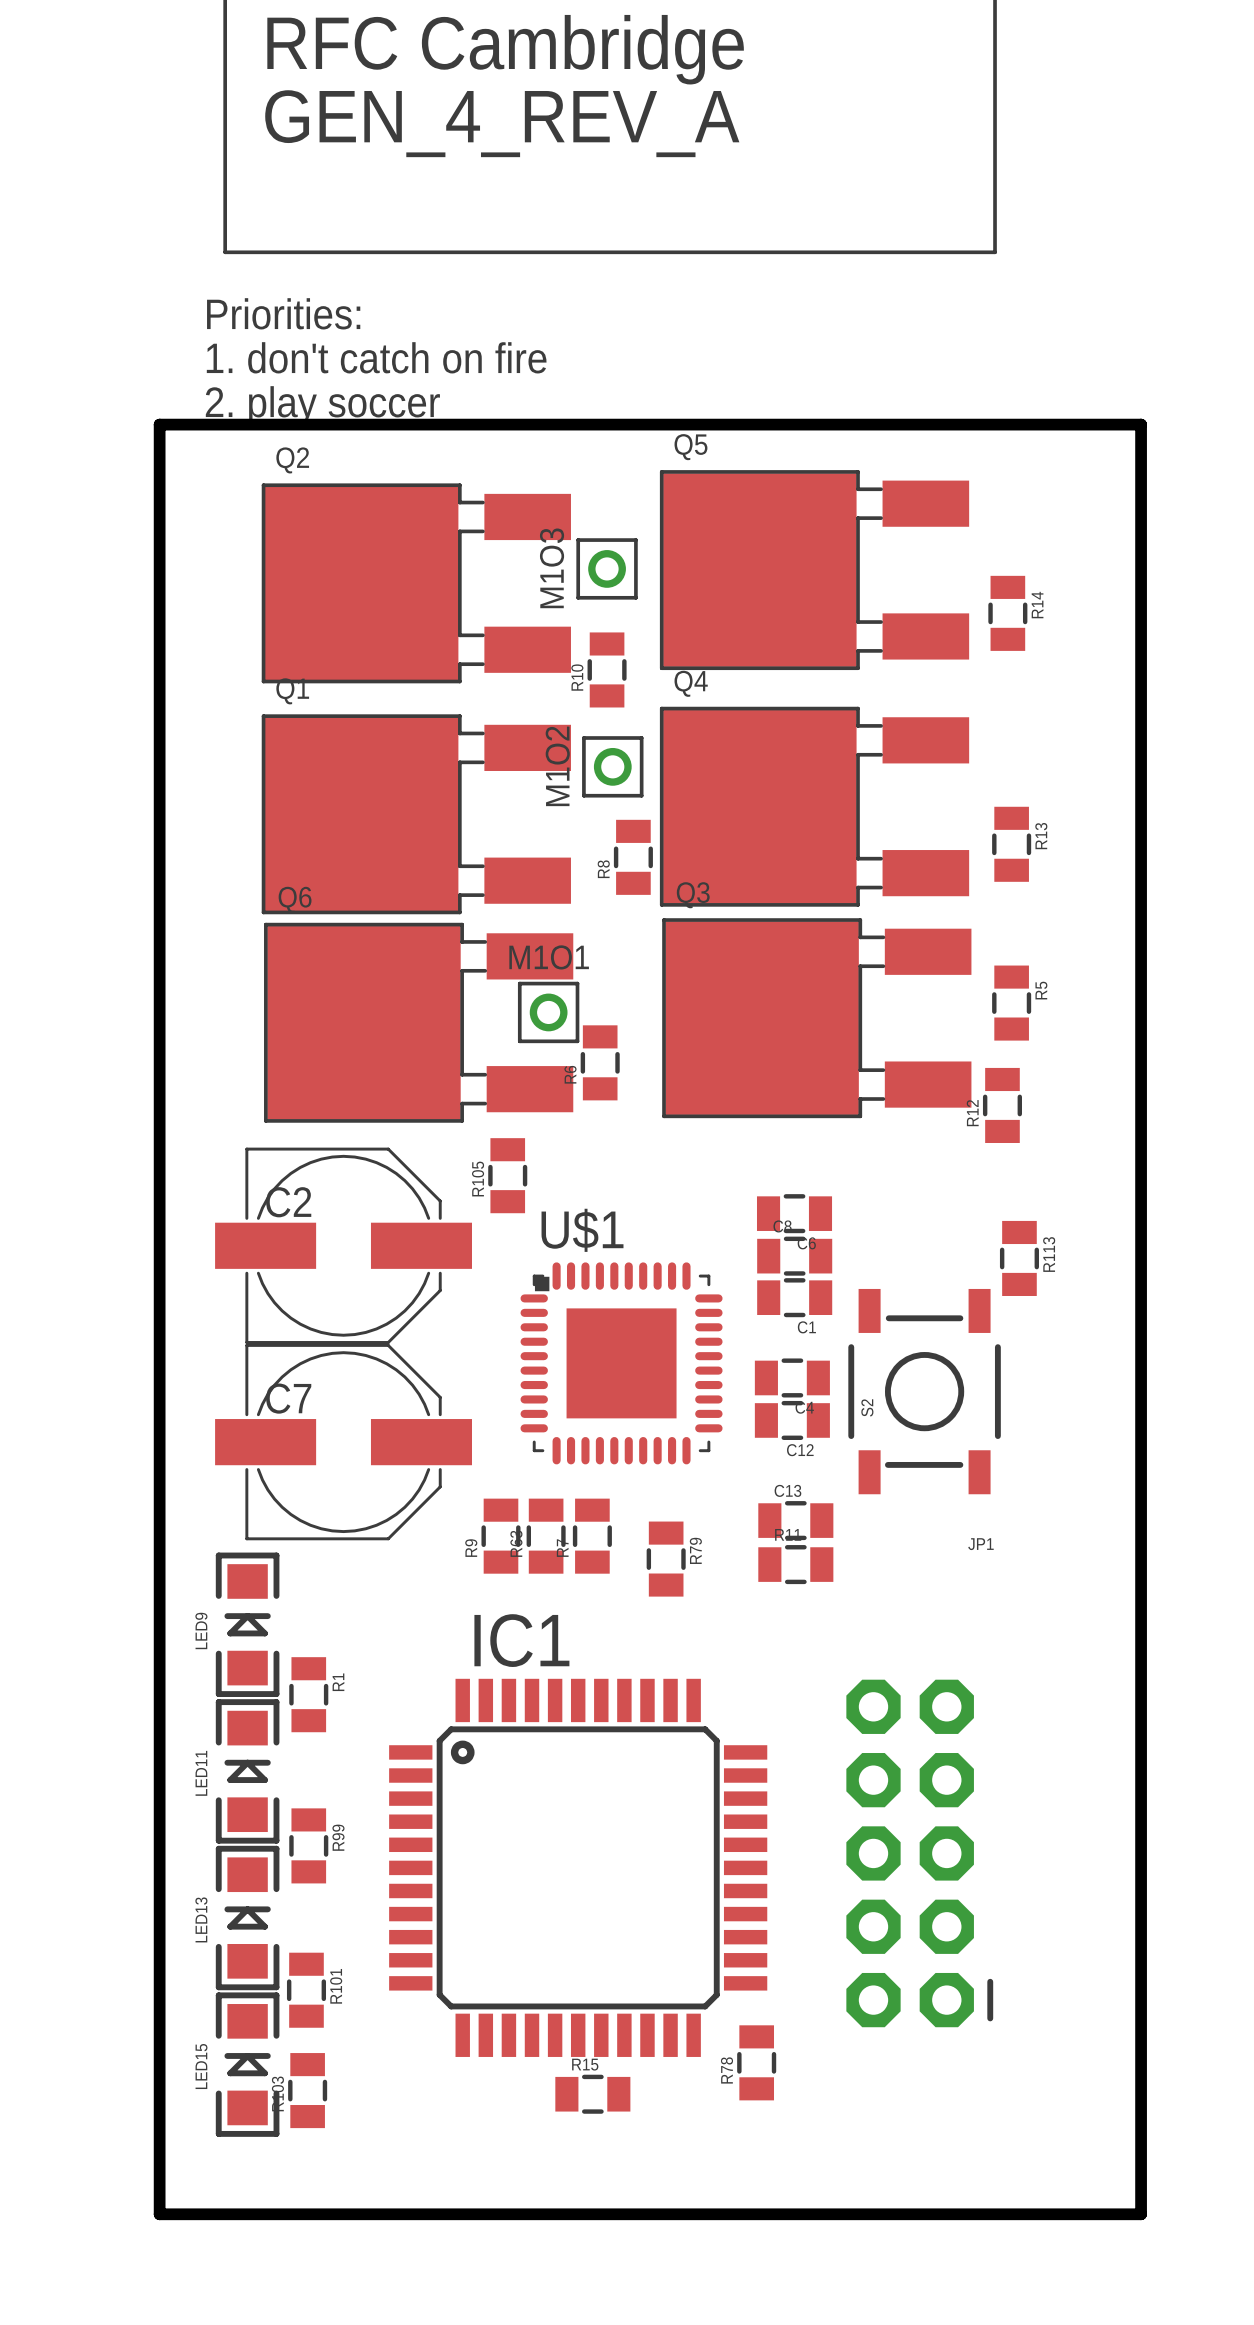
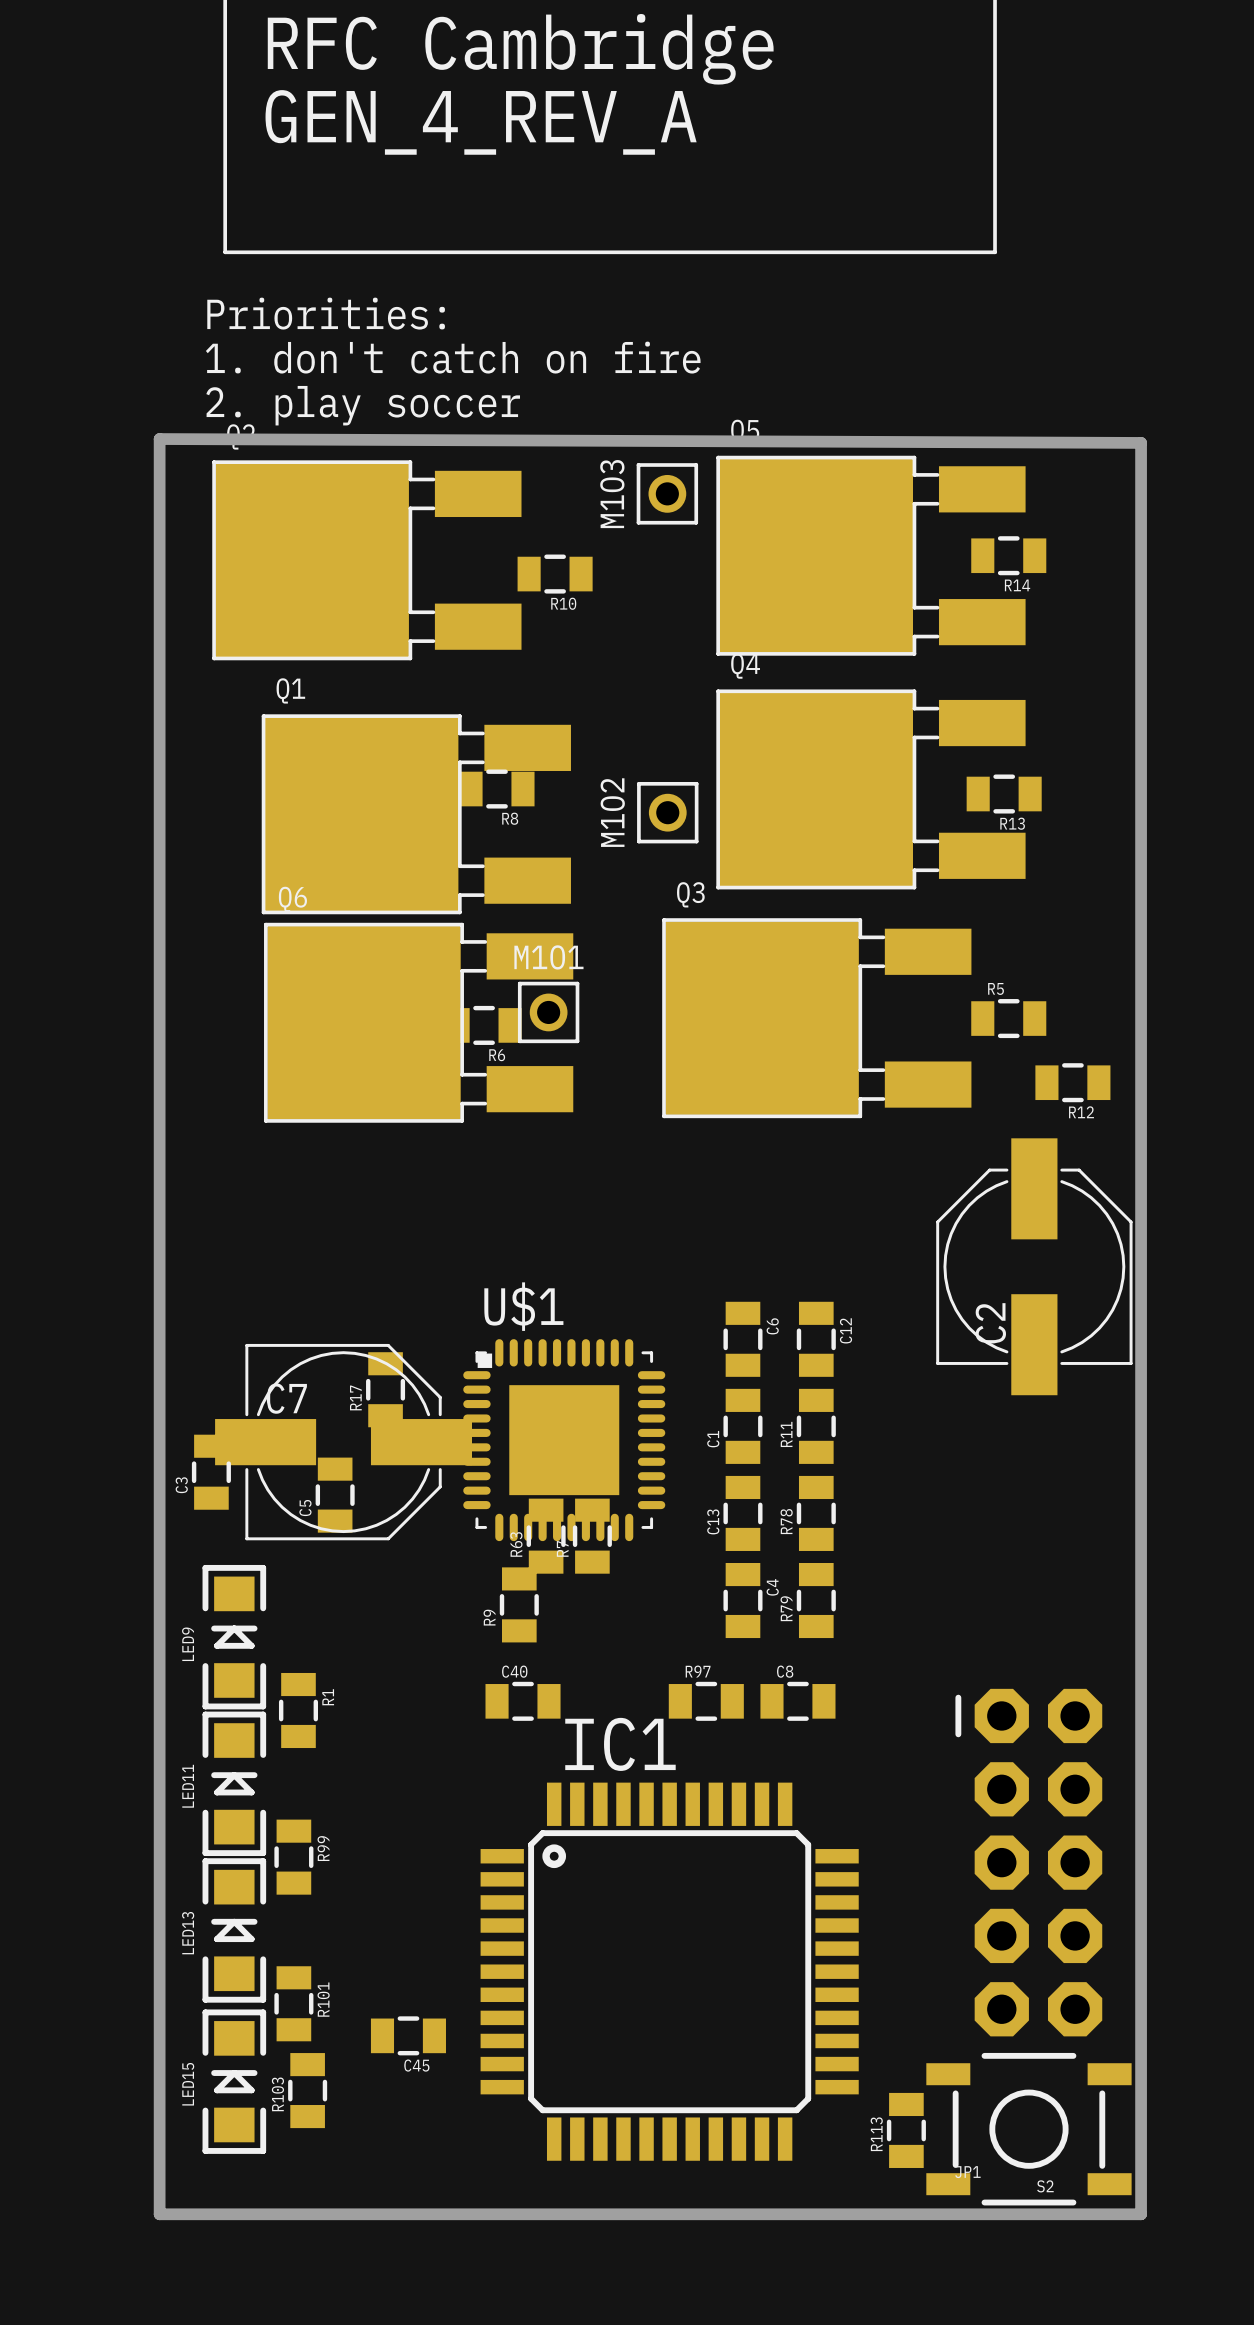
board edge: (159, 439) (159, 424) (1141, 424) (1141, 442) -> (159, 439) (1141, 442)
M1O3 position: (607, 568) -> (667, 493)
Q5 position: (814, 570) -> (870, 555)
Q2 position: (416, 583) -> (366, 560)
R14 rotation: 0° (1007, 613) -> 90° clockwise (1008, 555)
R14 position: (1007, 613) -> (1008, 555)
R10 rotation: 0° (607, 669) -> 90° clockwise (555, 574)
R10 position: (607, 669) -> (555, 574)
M1O2 position: (612, 766) -> (667, 812)
Q4 position: (814, 806) -> (870, 789)
R13 rotation: 0° (1011, 844) -> 90° clockwise (1004, 794)
R13 position: (1011, 844) -> (1004, 794)
R8 rotation: 0° (633, 857) -> 90° clockwise (497, 789)
R8 position: (633, 857) -> (497, 789)
R5 rotation: 0° (1011, 1003) -> 90° clockwise (1008, 1018)
R6 rotation: 0° (600, 1062) -> 90° clockwise (484, 1025)
R6 position: (600, 1062) -> (484, 1025)
R12 rotation: 0° (1002, 1105) -> 90° clockwise (1072, 1082)
R12 position: (1002, 1105) -> (1072, 1082)
R105: (507, 1175) -> none
C6 rotation: 0° (794, 1213) -> 90° clockwise (742, 1339)
C6 position: (794, 1213) -> (742, 1339)
C2 rotation: 0° (343, 1245) -> 90° counterclockwise (1034, 1266)
C2 position: (343, 1245) -> (1034, 1266)
R113 name position: R113 (1049, 1254) -> R113 (876, 2134)
C8 position: (794, 1256) -> (797, 1701)
R113 position: (1019, 1258) -> (906, 2130)
C1 rotation: 0° (794, 1297) -> 90° clockwise (742, 1426)
C1 position: (794, 1297) -> (742, 1426)
U$1 position: (621, 1363) -> (564, 1440)
C4 rotation: 0° (792, 1377) -> 90° clockwise (742, 1600)
C4 position: (792, 1377) -> (742, 1600)
R17: none -> (385, 1389)
S2 rotation: 0° (924, 1391) -> 90° counterclockwise (1028, 2129)
S2 position: (924, 1391) -> (1028, 2129)
C12 rotation: 0° (792, 1420) -> 90° clockwise (816, 1339)
C12 position: (792, 1420) -> (816, 1339)
C3: none -> (211, 1472)
C5: none -> (335, 1495)
C13 rotation: 0° (795, 1520) -> 90° clockwise (742, 1513)
C13 position: (795, 1520) -> (742, 1513)
R9 position: (500, 1536) -> (519, 1604)
R79 name position: R79 (695, 1550) -> R79 (786, 1608)
R79 position: (666, 1559) -> (816, 1600)
R11 rotation: 0° (795, 1564) -> 90° clockwise (816, 1426)
R11 position: (795, 1564) -> (816, 1426)
LED9 position: (247, 1624) -> (234, 1637)
R1 position: (308, 1694) -> (298, 1710)
C40: none -> (523, 1701)
R97: none -> (706, 1701)
LED11 position: (247, 1771) -> (234, 1783)
R99 position: (308, 1845) -> (293, 1857)
JP1 rotation: 0° (919, 1853) -> 180° (1028, 1862)
IC1 position: (578, 1867) -> (669, 1971)
LED13 position: (247, 1918) -> (234, 1930)
R101 position: (306, 1990) -> (293, 2003)
C45: none -> (408, 2035)
R78 position: (756, 2062) -> (816, 1513)
LED15 position: (247, 2064) -> (234, 2081)
R15: (592, 2094) -> none

